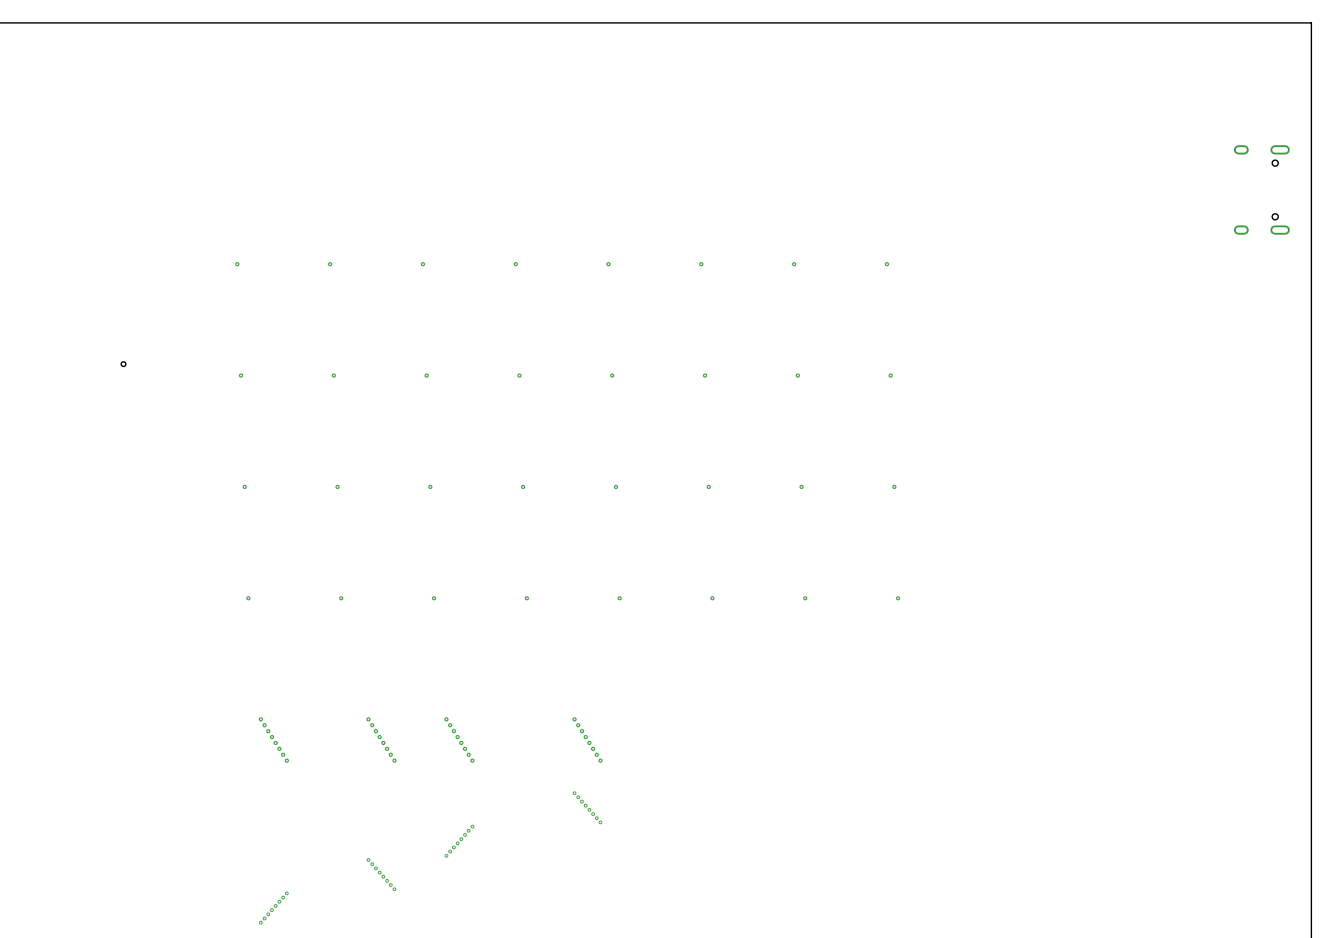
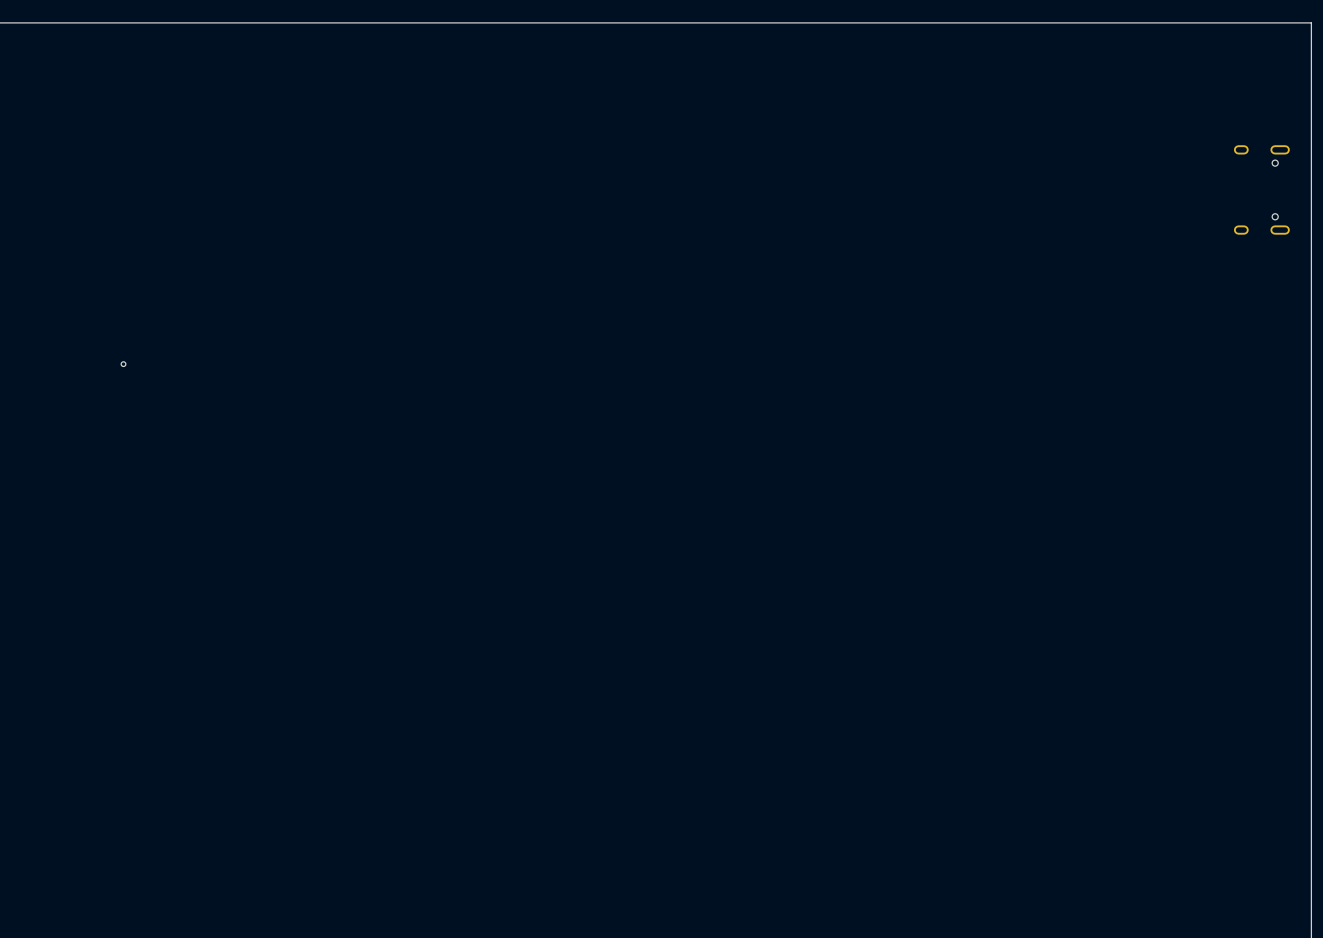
via: (237, 264) -> none
via: (330, 264) -> none
via: (422, 264) -> none
via: (515, 264) -> none
via: (608, 264) -> none
via: (701, 264) -> none
via: (794, 264) -> none
via: (886, 264) -> none
via: (241, 375) -> none
via: (333, 375) -> none
via: (426, 375) -> none
via: (519, 375) -> none
via: (612, 375) -> none
via: (705, 375) -> none
via: (797, 375) -> none
via: (890, 375) -> none
via: (244, 486) -> none
via: (337, 486) -> none
via: (430, 486) -> none
via: (523, 486) -> none
via: (615, 486) -> none
via: (708, 486) -> none
via: (801, 486) -> none
via: (894, 486) -> none
via: (248, 598) -> none
via: (341, 598) -> none
via: (434, 598) -> none
via: (526, 598) -> none
via: (619, 598) -> none
via: (712, 598) -> none
via: (805, 598) -> none
via: (898, 598) -> none
via: (260, 719) -> none
via: (368, 719) -> none
via: (446, 719) -> none
via: (574, 719) -> none
via: (264, 725) -> none
via: (372, 725) -> none
via: (450, 725) -> none
via: (578, 725) -> none
via: (268, 731) -> none
via: (375, 731) -> none
via: (453, 731) -> none
via: (581, 731) -> none
via: (271, 737) -> none
via: (379, 737) -> none
via: (457, 737) -> none
via: (585, 737) -> none
via: (275, 742) -> none
via: (383, 742) -> none
via: (461, 742) -> none
via: (589, 742) -> none
via: (279, 748) -> none
via: (387, 748) -> none
via: (465, 748) -> none
via: (593, 748) -> none
via: (283, 754) -> none
via: (390, 754) -> none
via: (468, 754) -> none
via: (596, 754) -> none
via: (286, 760) -> none
via: (394, 760) -> none
via: (472, 760) -> none
via: (600, 760) -> none
via: (574, 793) -> none
via: (578, 797) -> none
via: (581, 801) -> none
via: (585, 805) -> none
via: (589, 809) -> none
via: (593, 814) -> none
via: (596, 818) -> none
via: (600, 822) -> none
via: (472, 826) -> none
via: (468, 830) -> none
via: (465, 834) -> none
via: (461, 839) -> none
via: (457, 843) -> none
via: (453, 847) -> none
via: (450, 851) -> none
via: (446, 855) -> none
via: (368, 860) -> none
via: (372, 864) -> none
via: (375, 868) -> none
via: (379, 872) -> none
via: (383, 876) -> none
via: (387, 880) -> none
via: (390, 885) -> none
via: (394, 889) -> none
via: (286, 893) -> none
via: (283, 897) -> none
via: (279, 901) -> none
via: (275, 905) -> none
via: (271, 910) -> none
via: (268, 914) -> none
via: (264, 918) -> none
via: (260, 922) -> none

